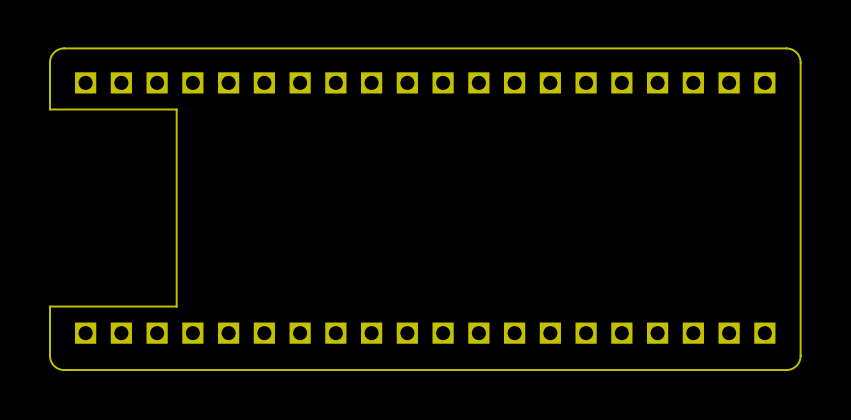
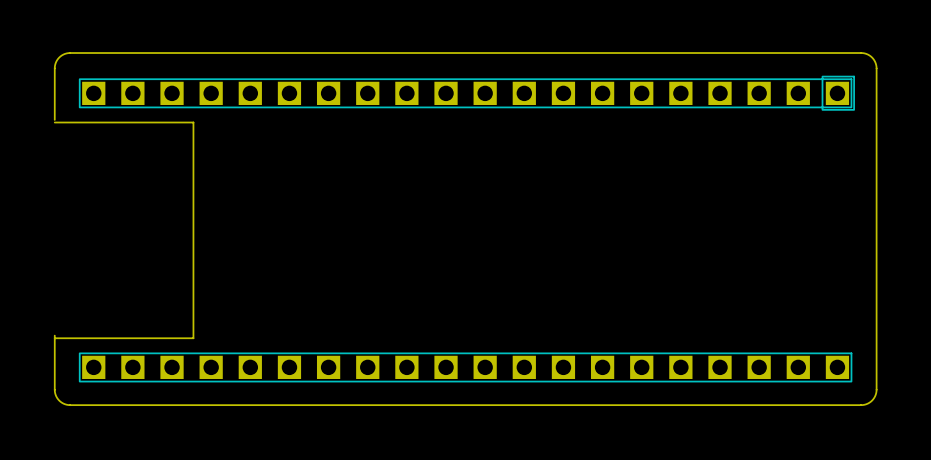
part side: top (412, 208) -> bottom (454, 229)

